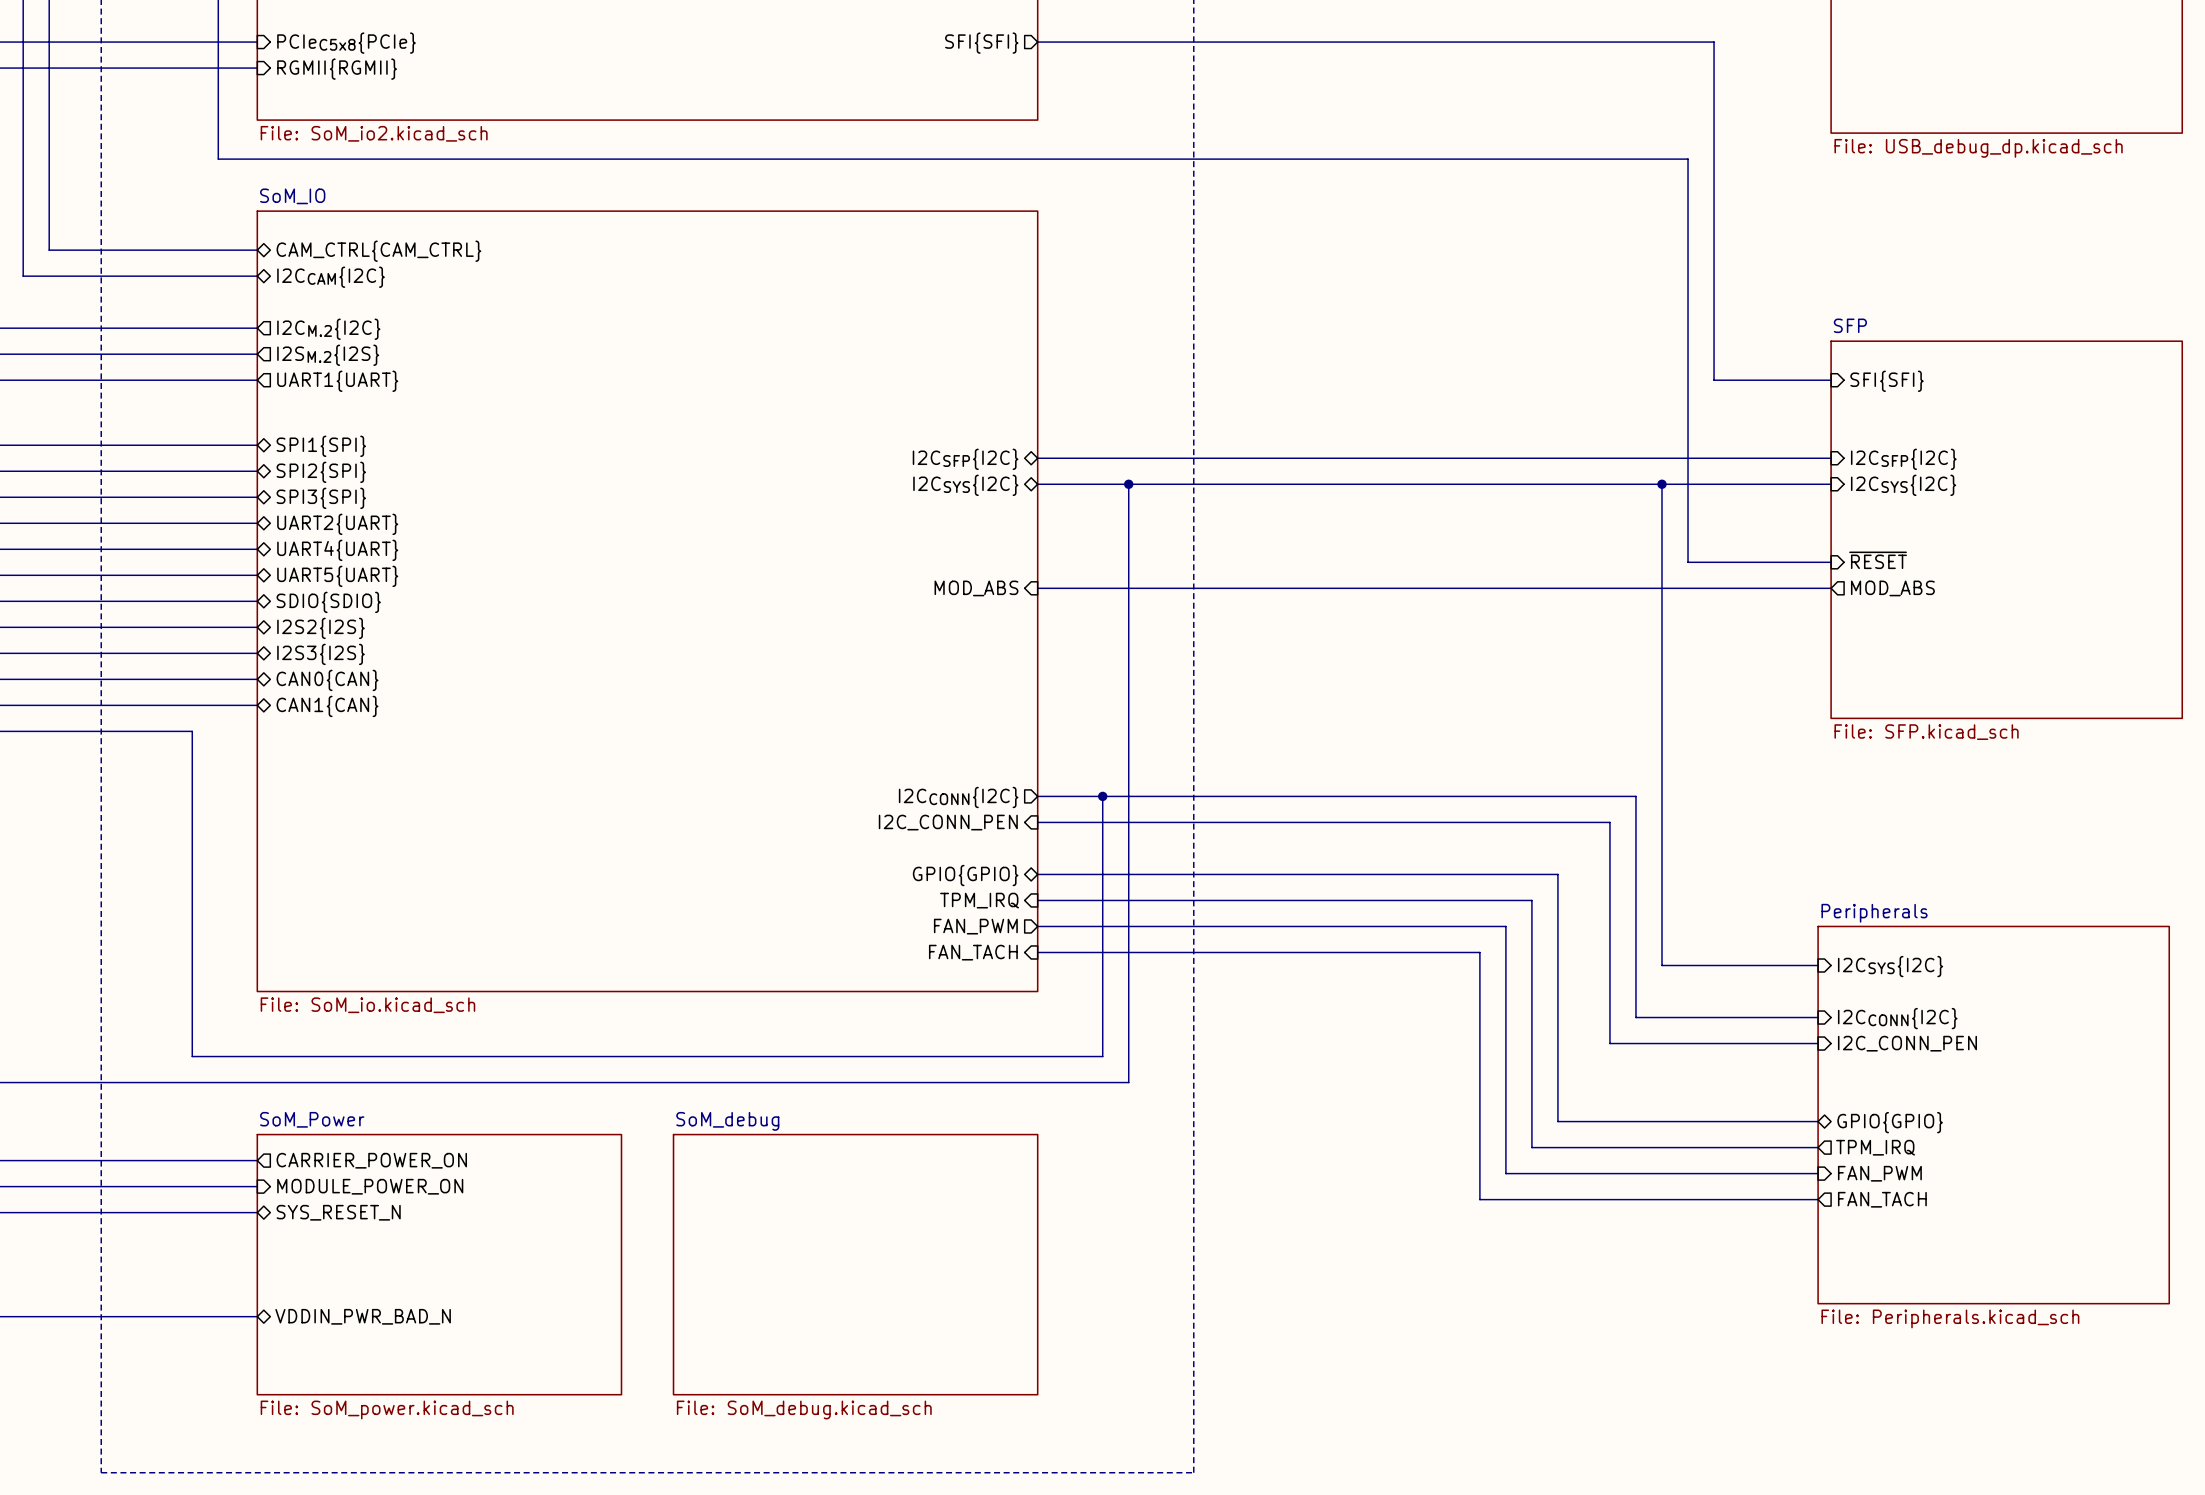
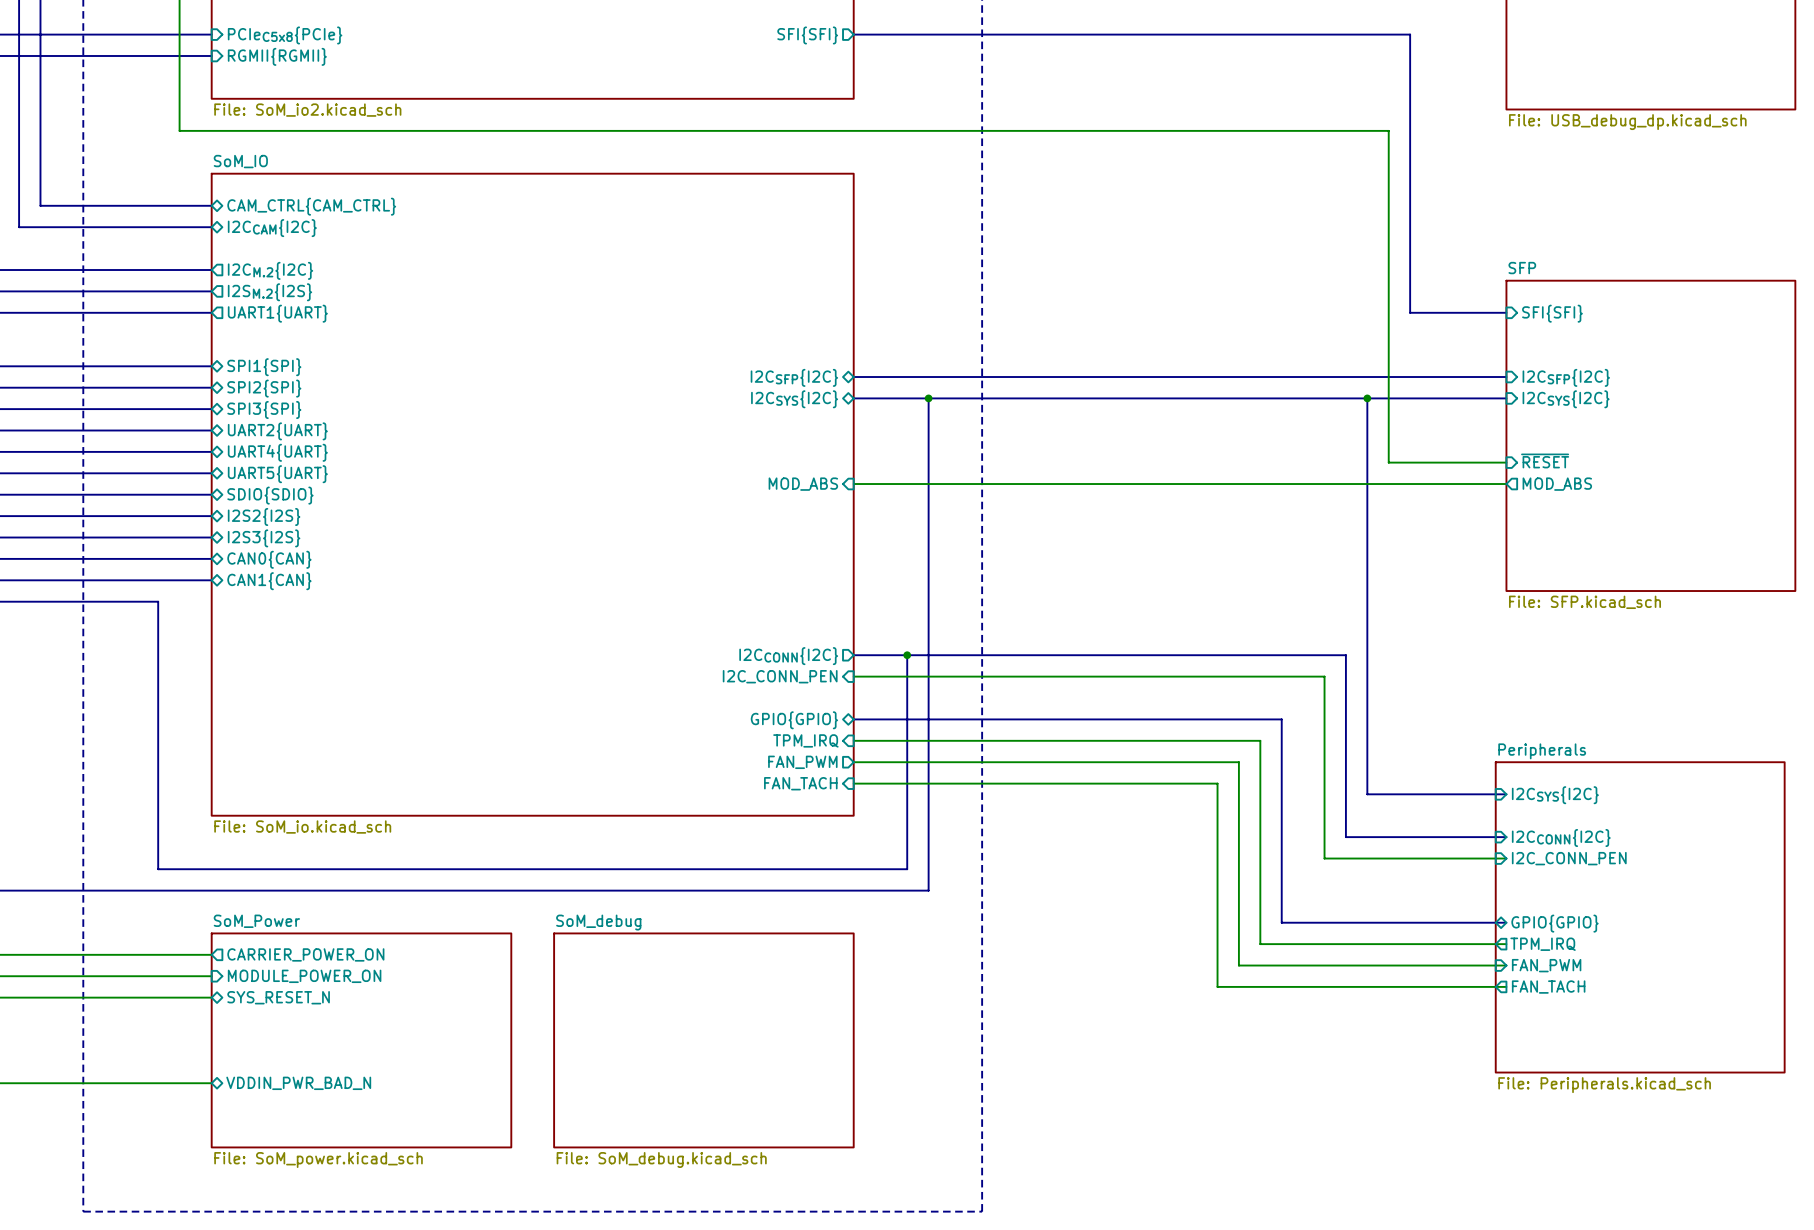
bus: none -> (1495, 794) (1506, 794)
bus: none -> (1495, 837) (1506, 837)
wire: none -> (1495, 858) (1506, 858)
bus: none -> (1495, 922) (1506, 922)
wire: none -> (1495, 944) (1506, 944)
wire: none -> (1495, 965) (1506, 965)
wire: none -> (1495, 986) (1506, 986)

